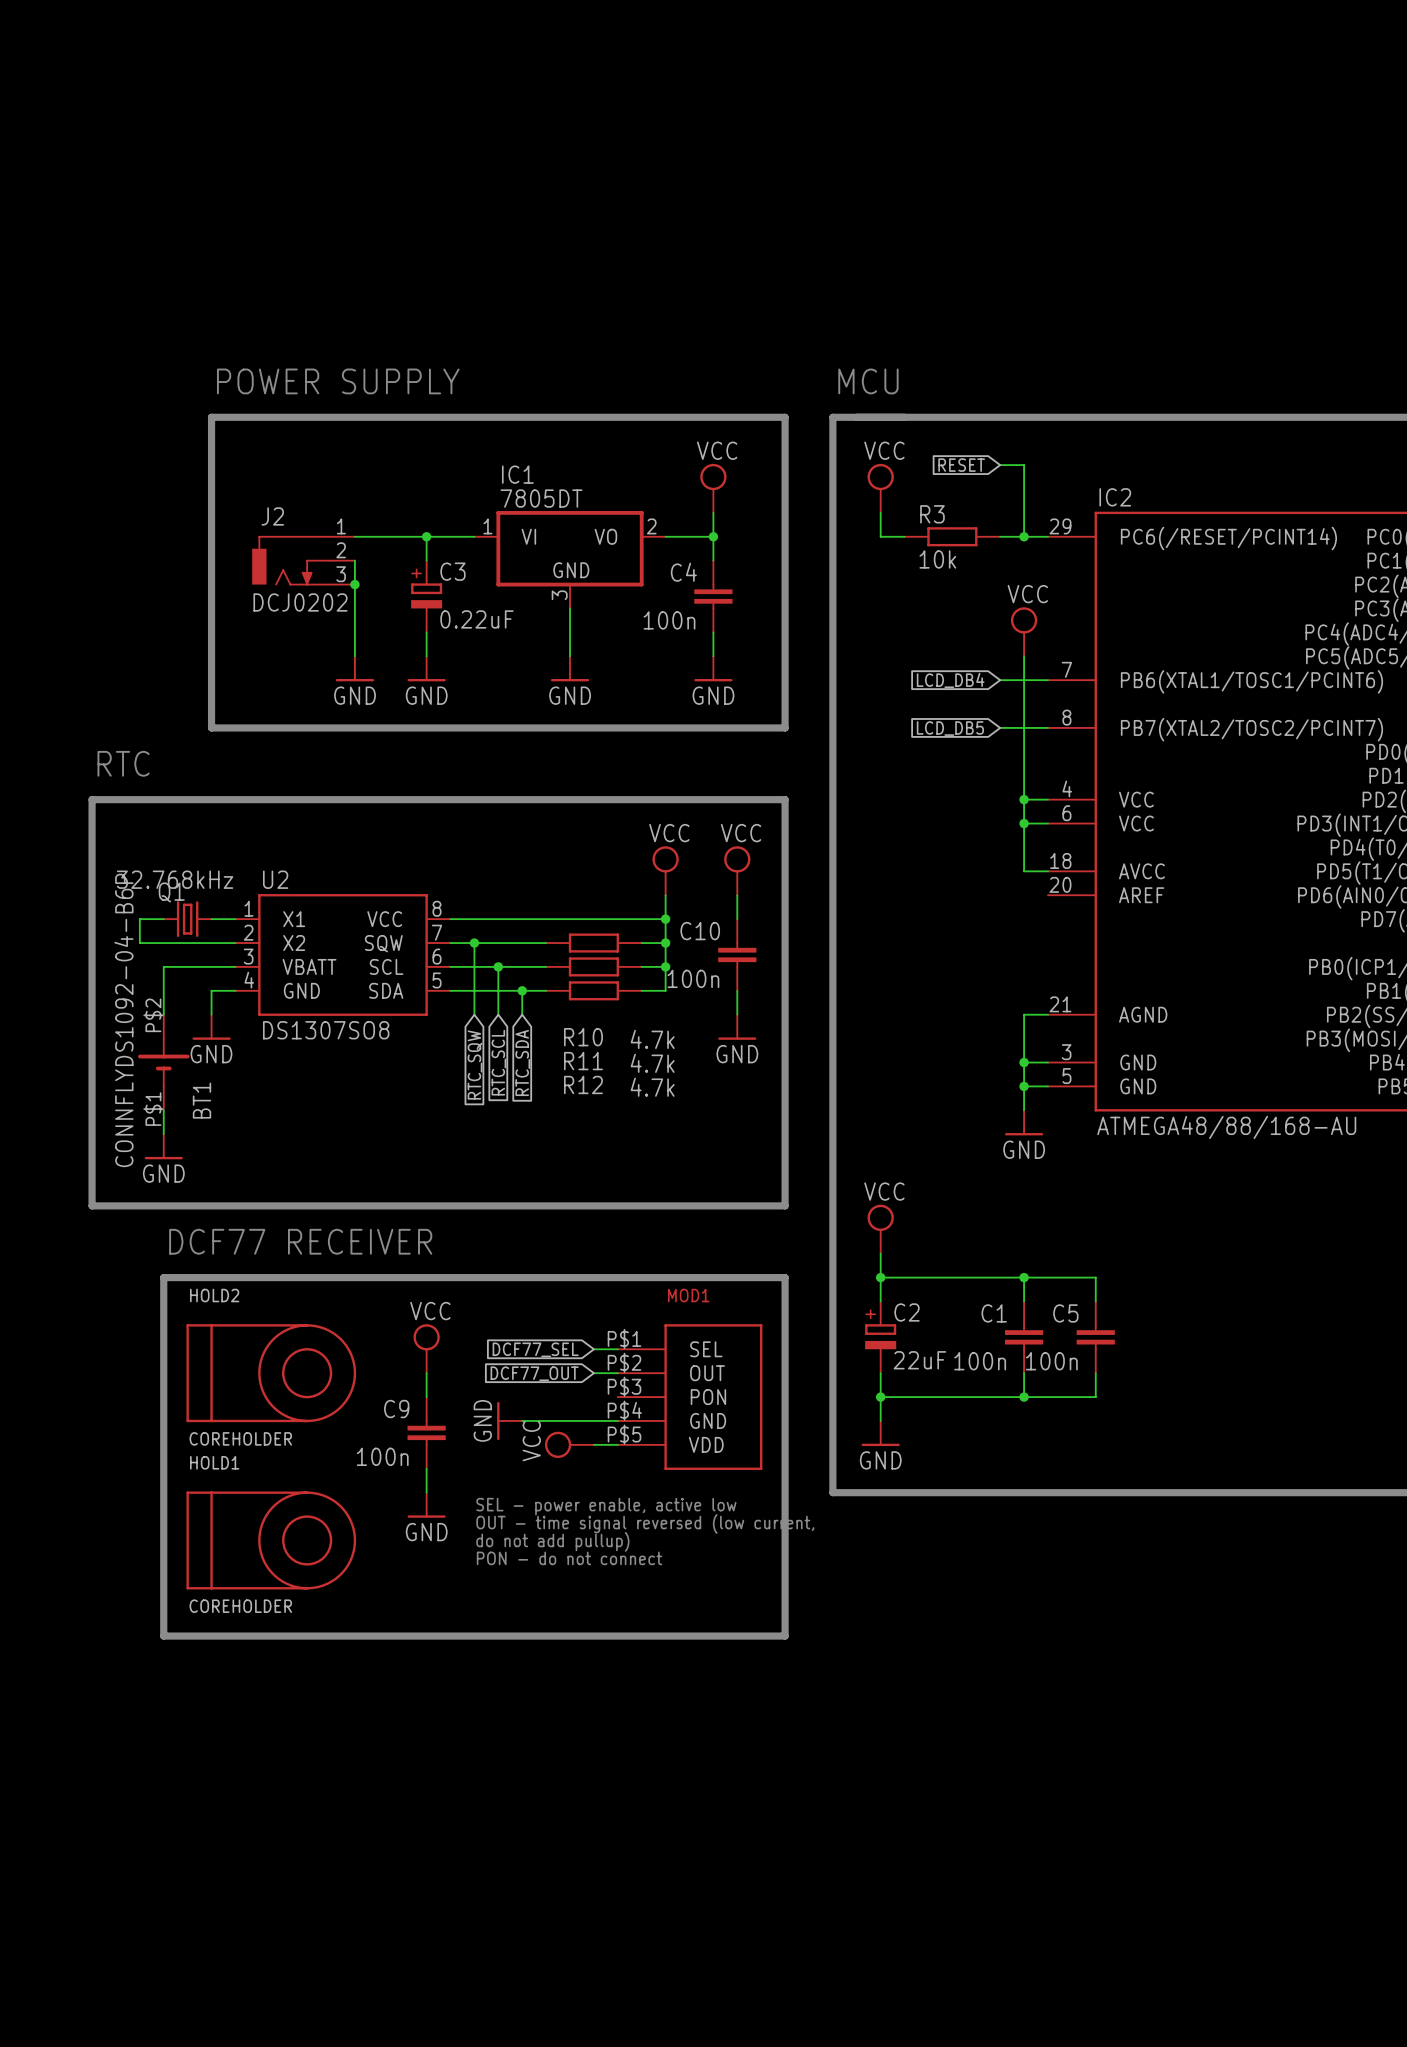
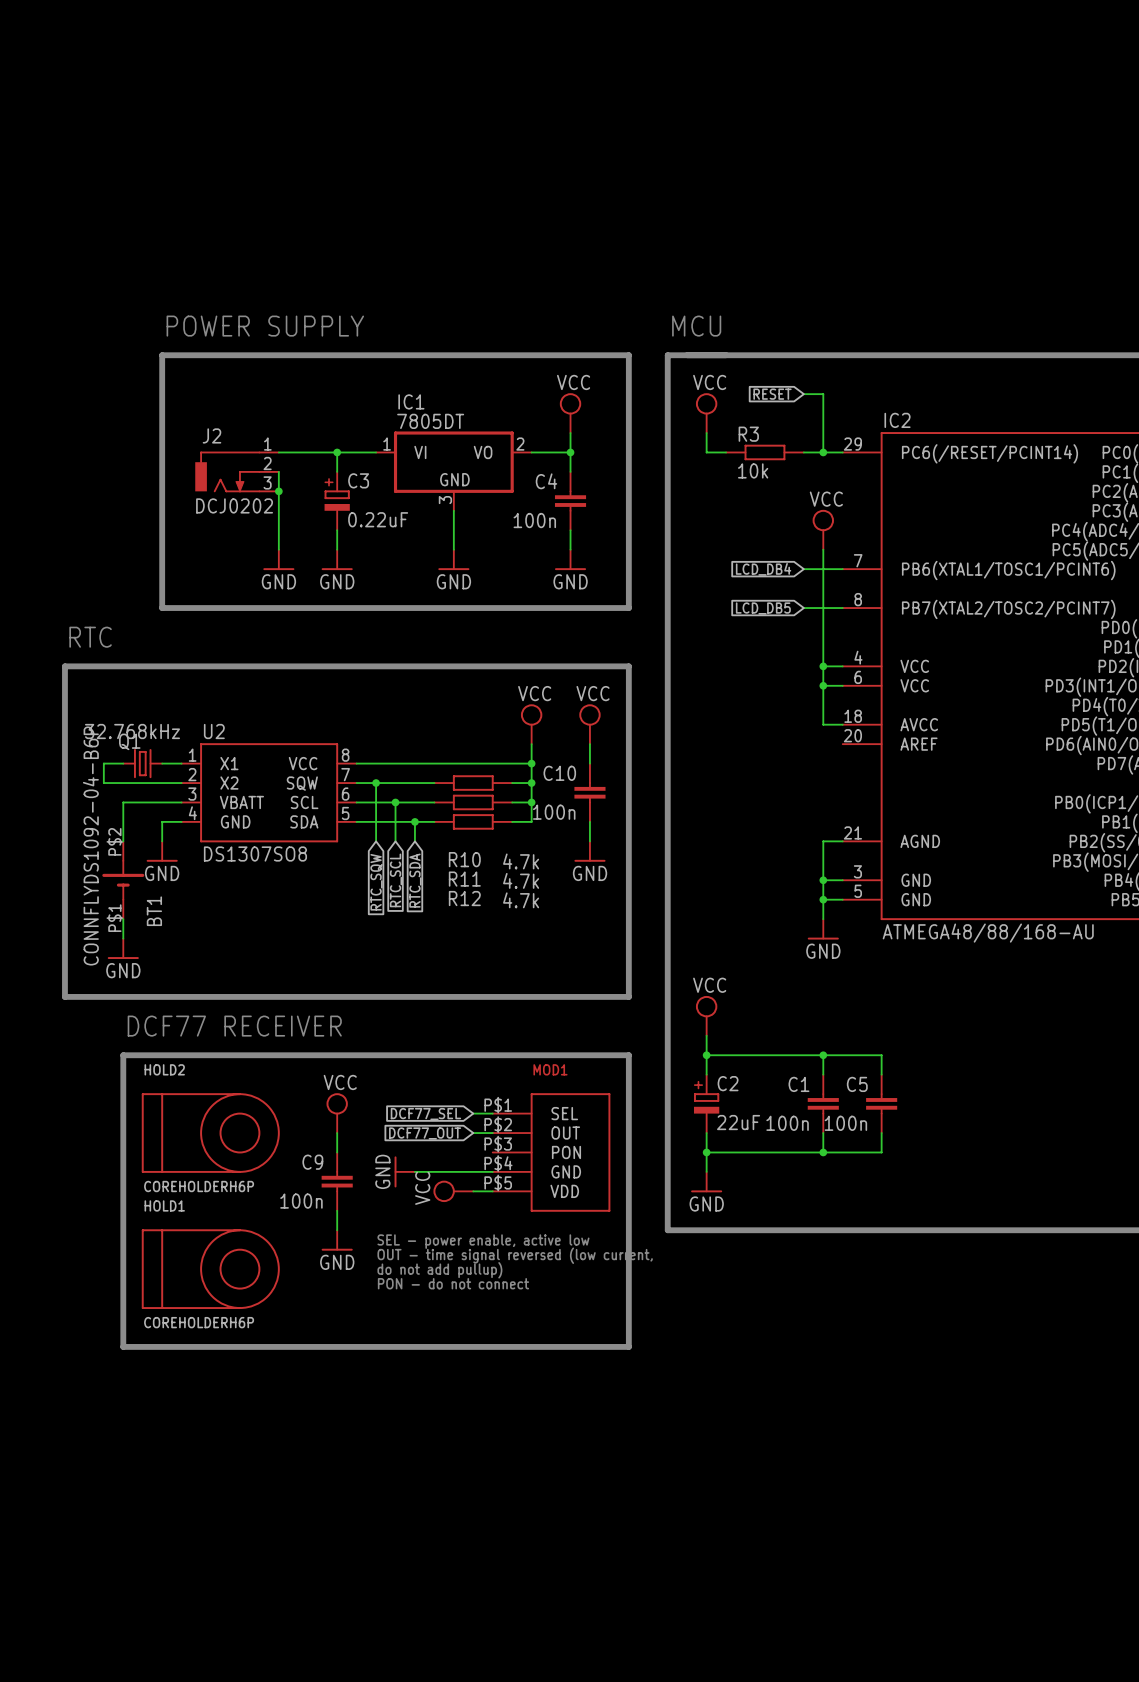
HOLD2 value: COREHOLDER (240, 1438) -> COREHOLDERH6P (199, 1186)
HOLD1 value: COREHOLDER (240, 1606) -> COREHOLDERH6P (199, 1322)

